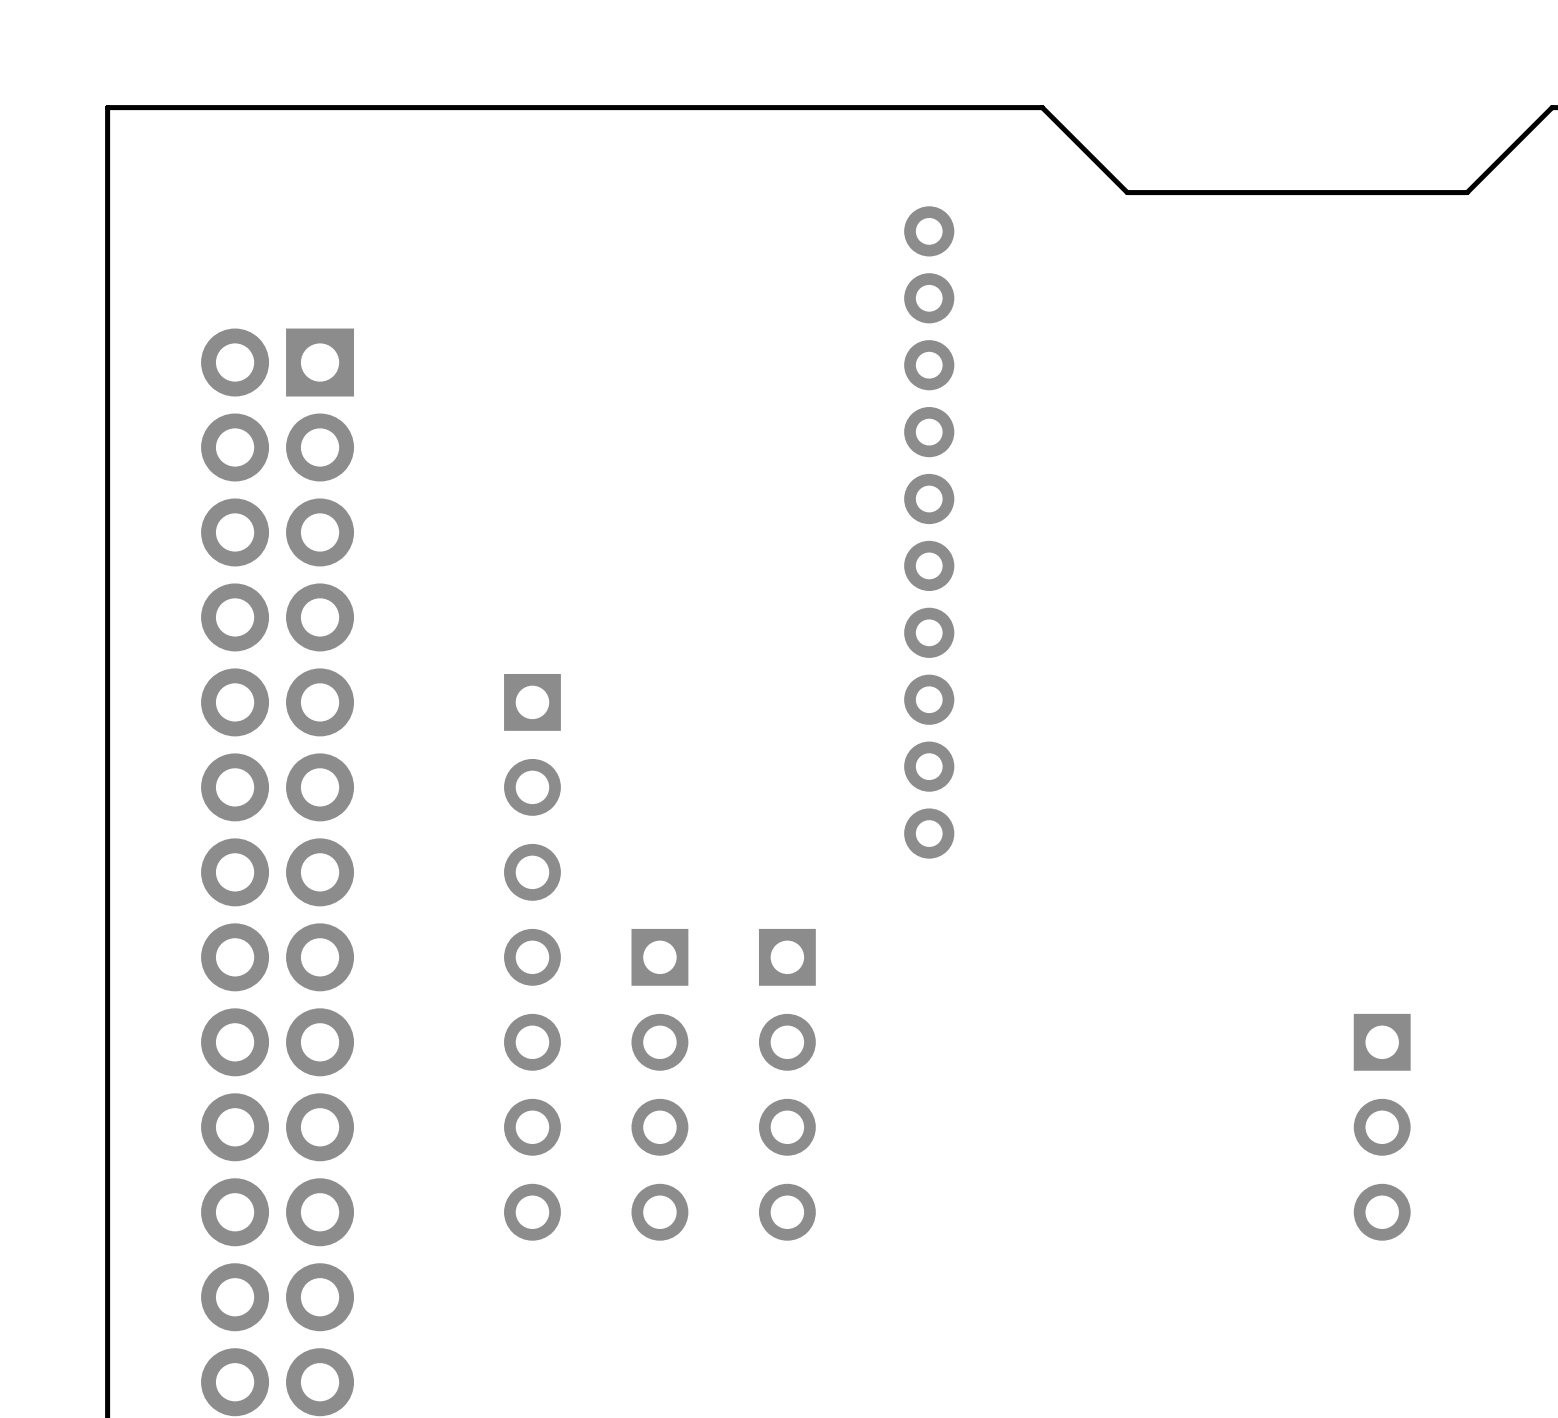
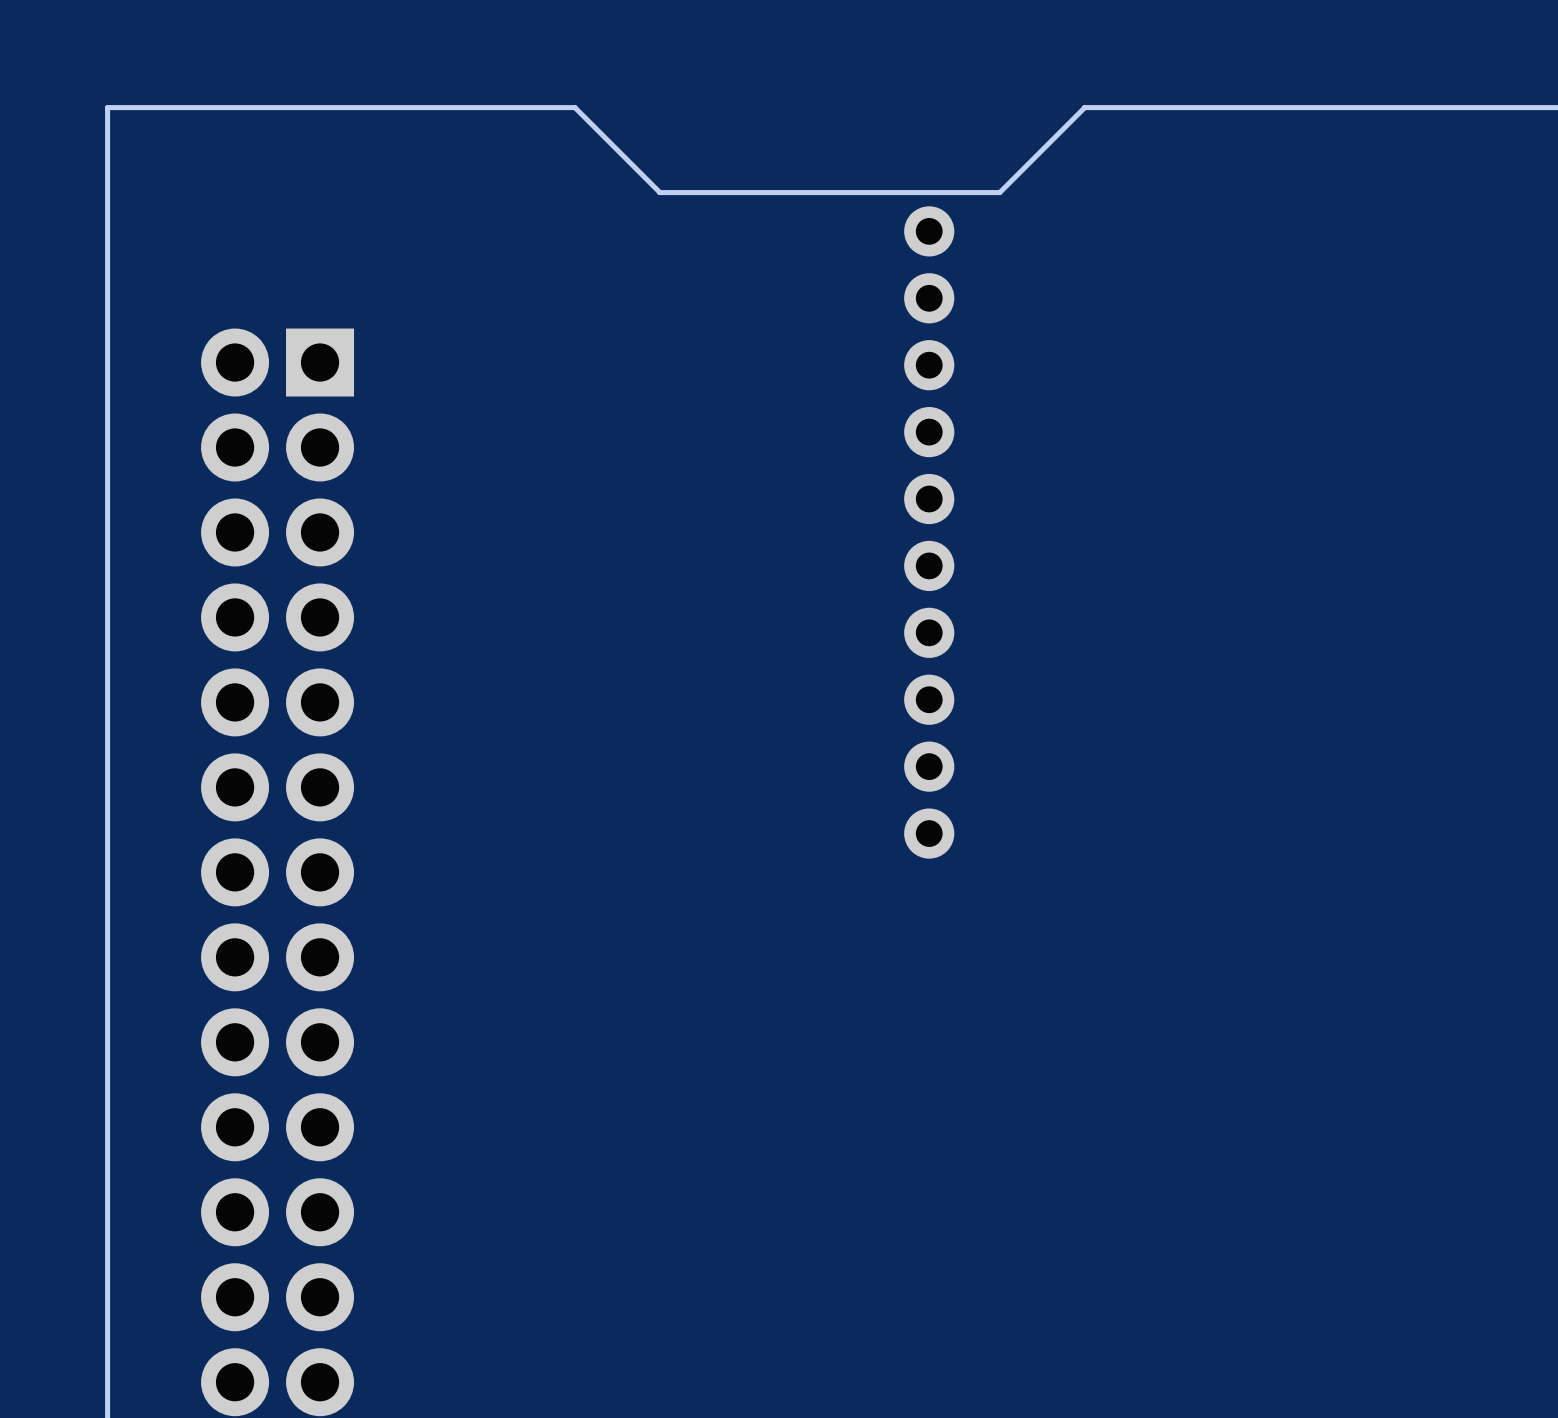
board edge: (1552, 107) (1467, 192) (1127, 192) (1042, 107) (574, 107) -> (1552, 107) (1084, 107) (999, 192) (659, 192) (574, 107)
part: (532, 957) -> none
part: (659, 1084) -> none
part: (787, 1084) -> none
part: (1382, 1127) -> none

